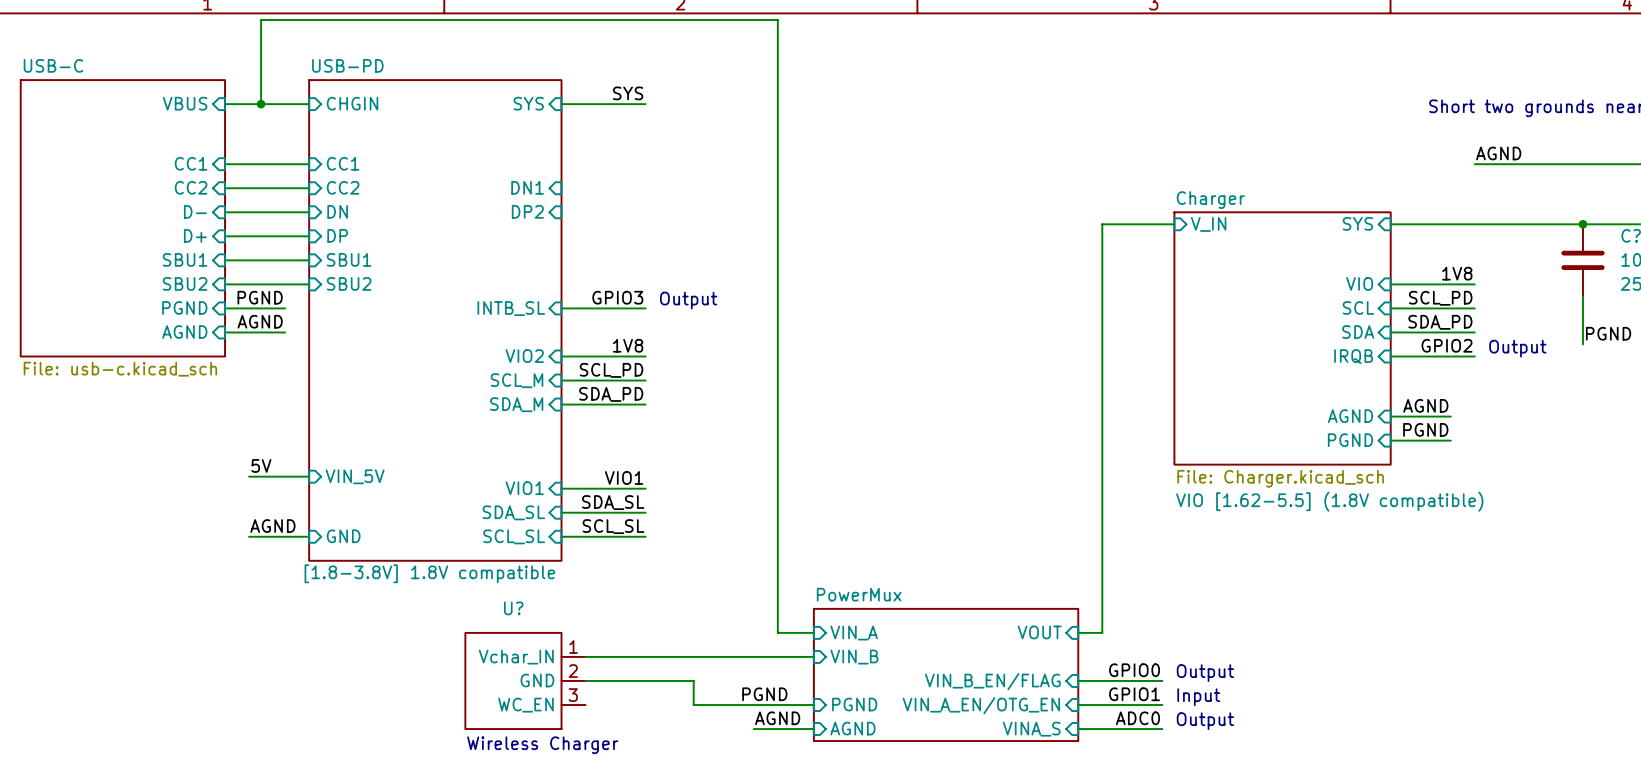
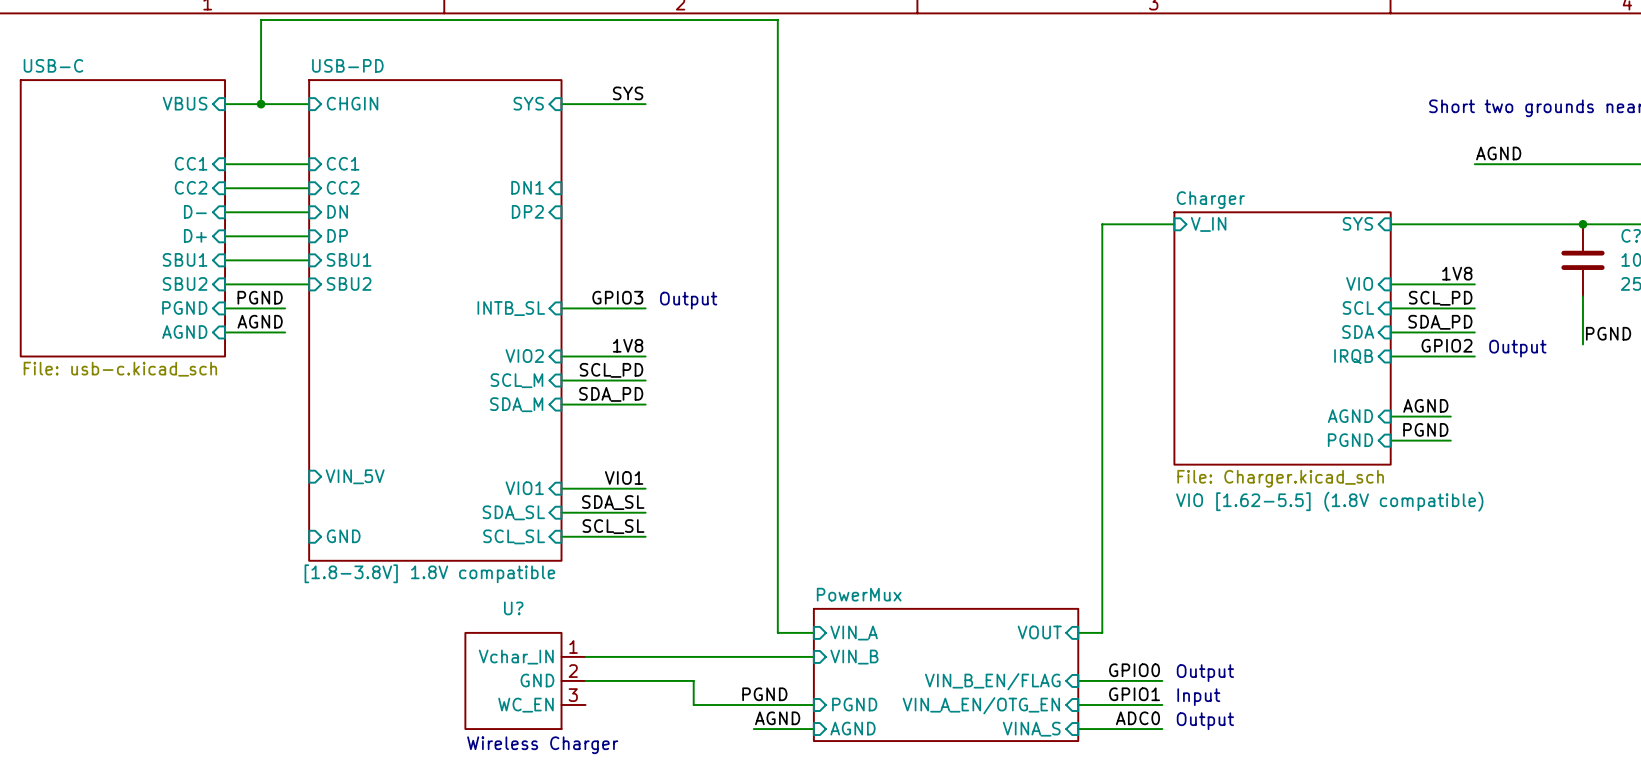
label: 5V (261, 465) -> none
wire: (249, 476) (309, 476) -> none
label: AGND (272, 526) -> none
wire: (249, 536) (309, 536) -> none

